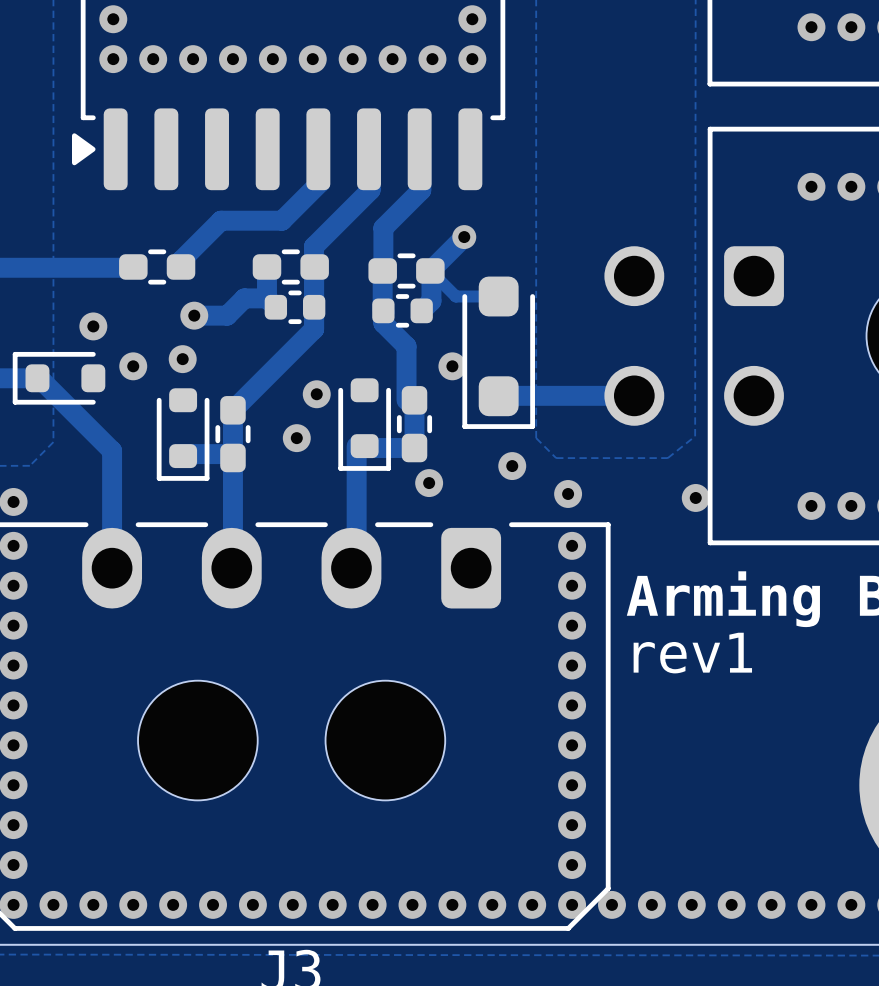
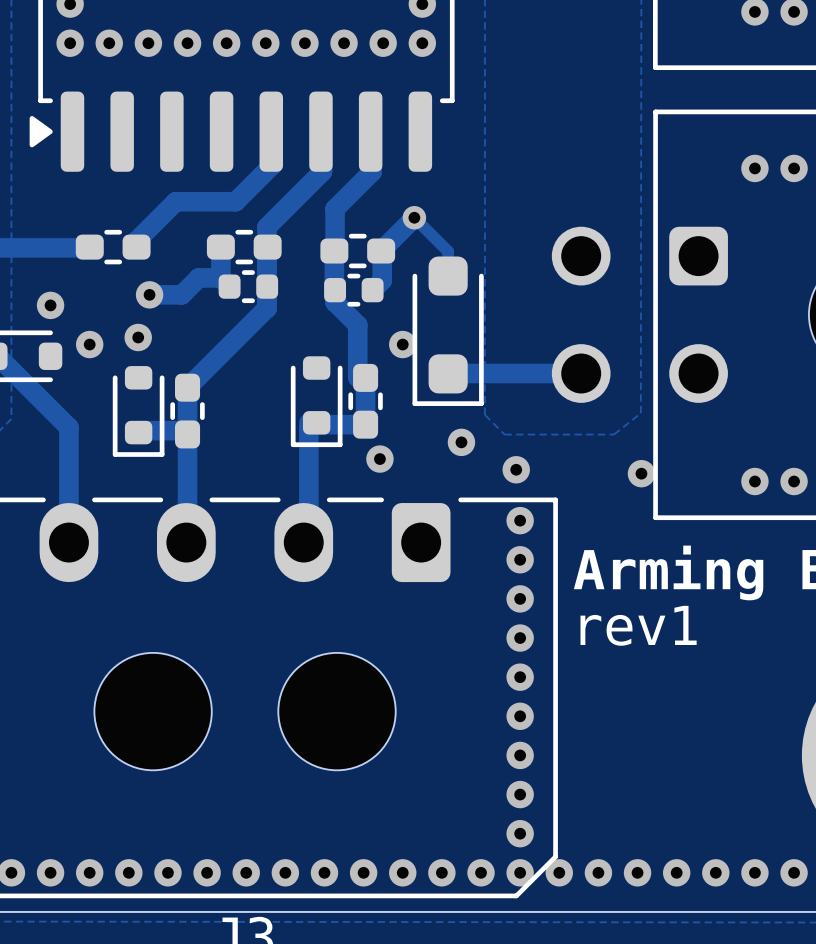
track: (430, 270) (455, 296) (498, 296) -> (414, 217) (448, 251) (448, 276)
via: (316, 394) -> none
via: (296, 438) -> none

